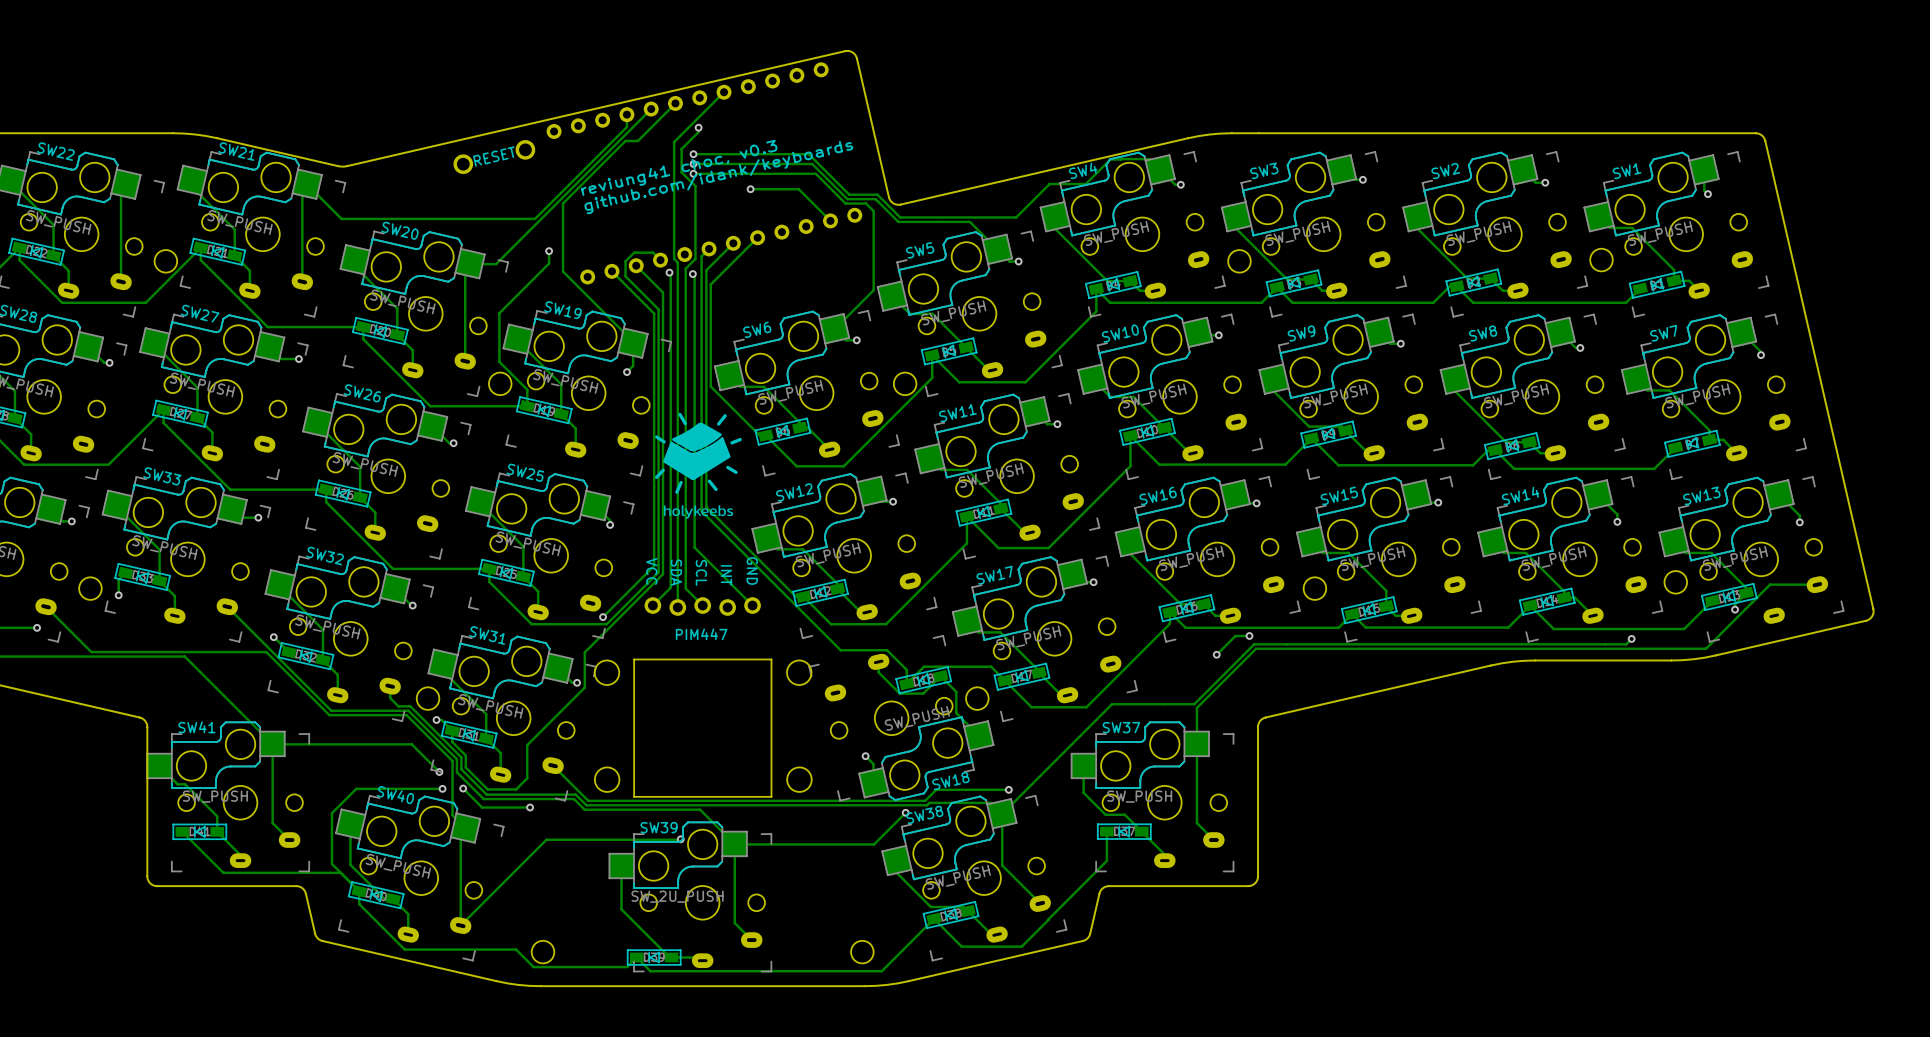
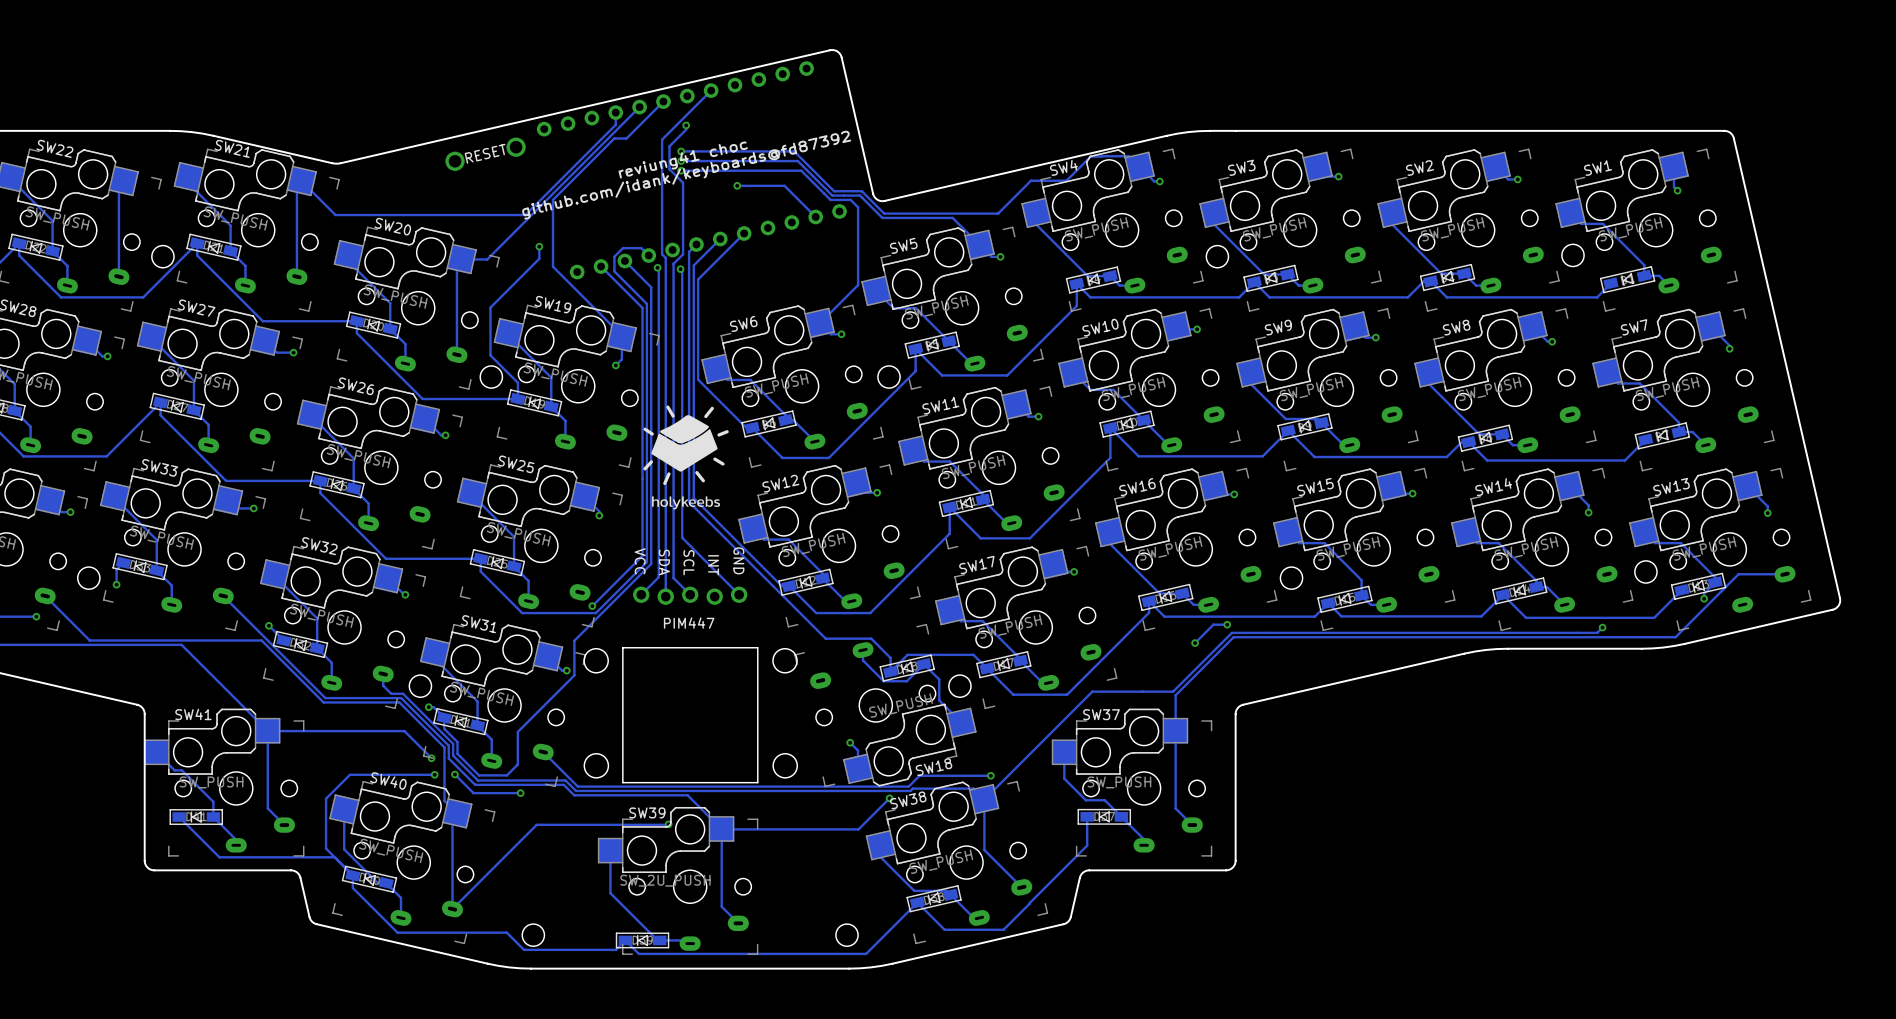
text: reviung41 choc, v0.3 (679, 167) -> reviung41 choc (683, 160)
text: github.com/idank/keyboards (718, 177) -> github.com/idank/keyboards@fd87392 (686, 175)

